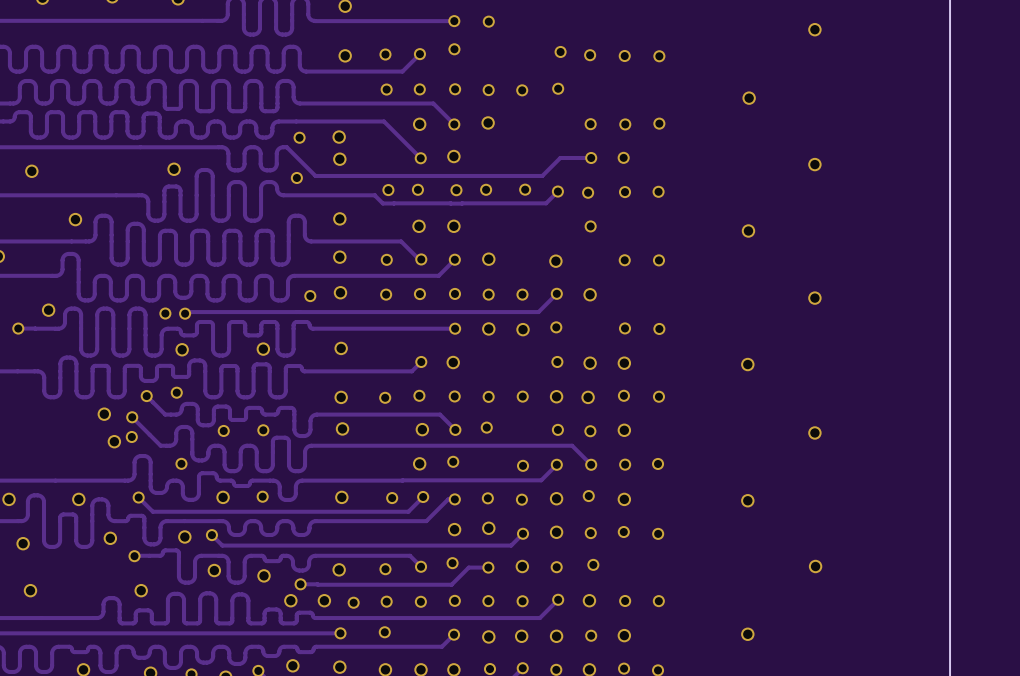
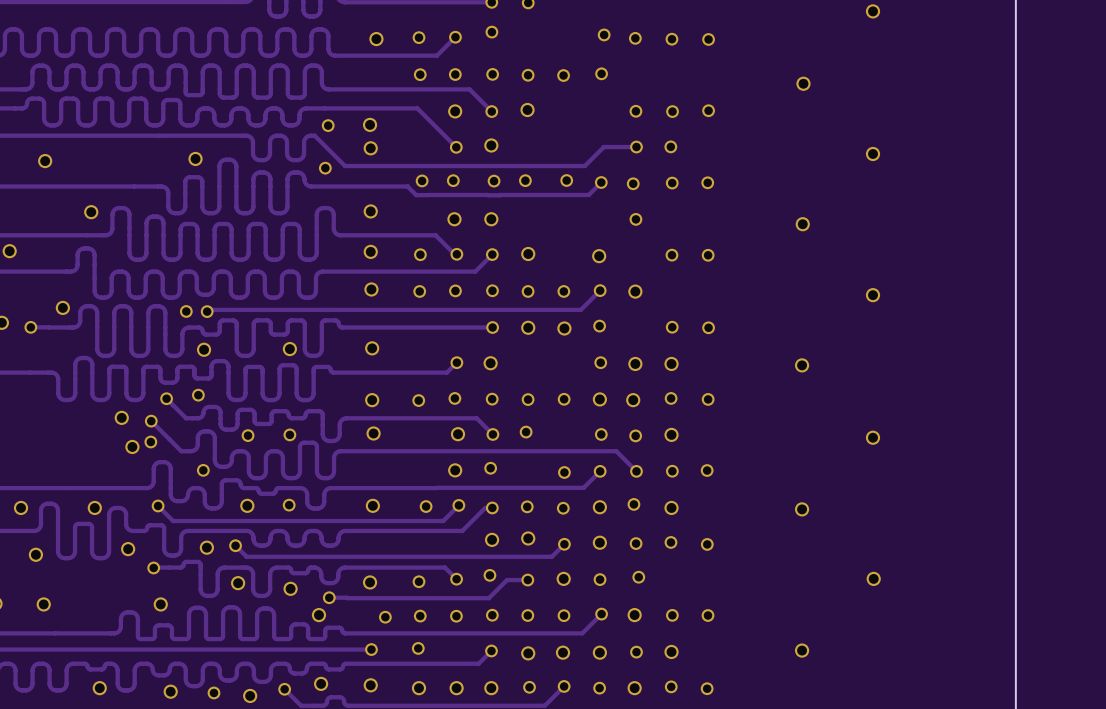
via: (310, 296) -> none
via: (324, 600) -> none

